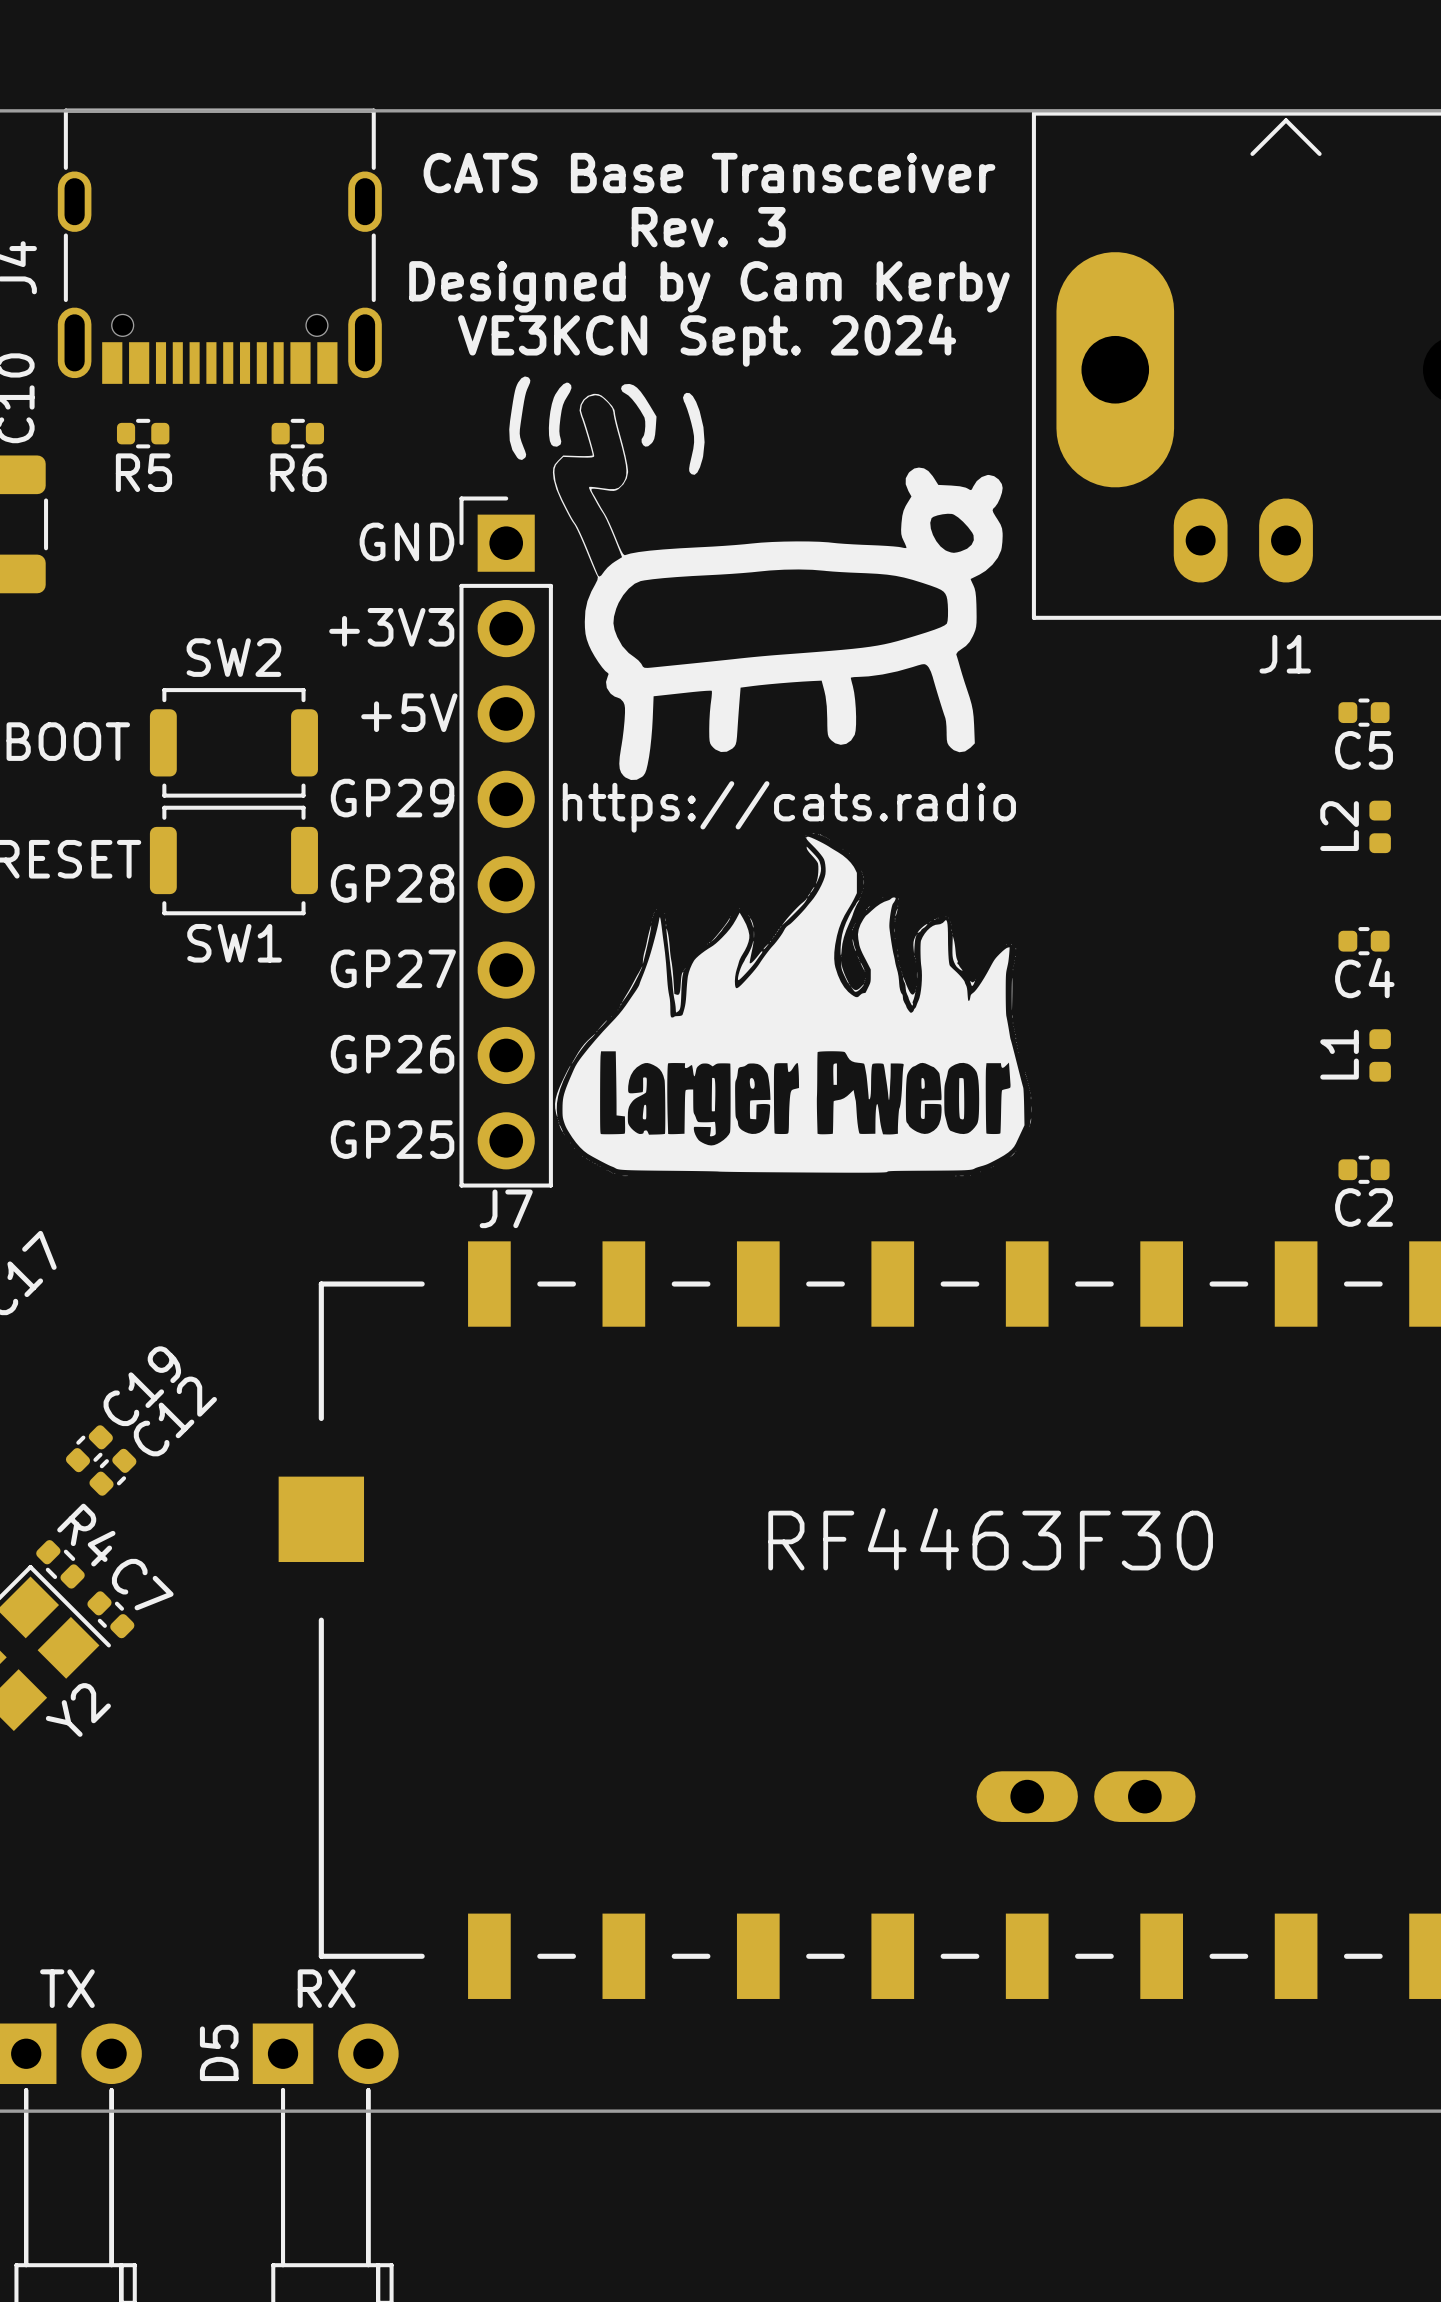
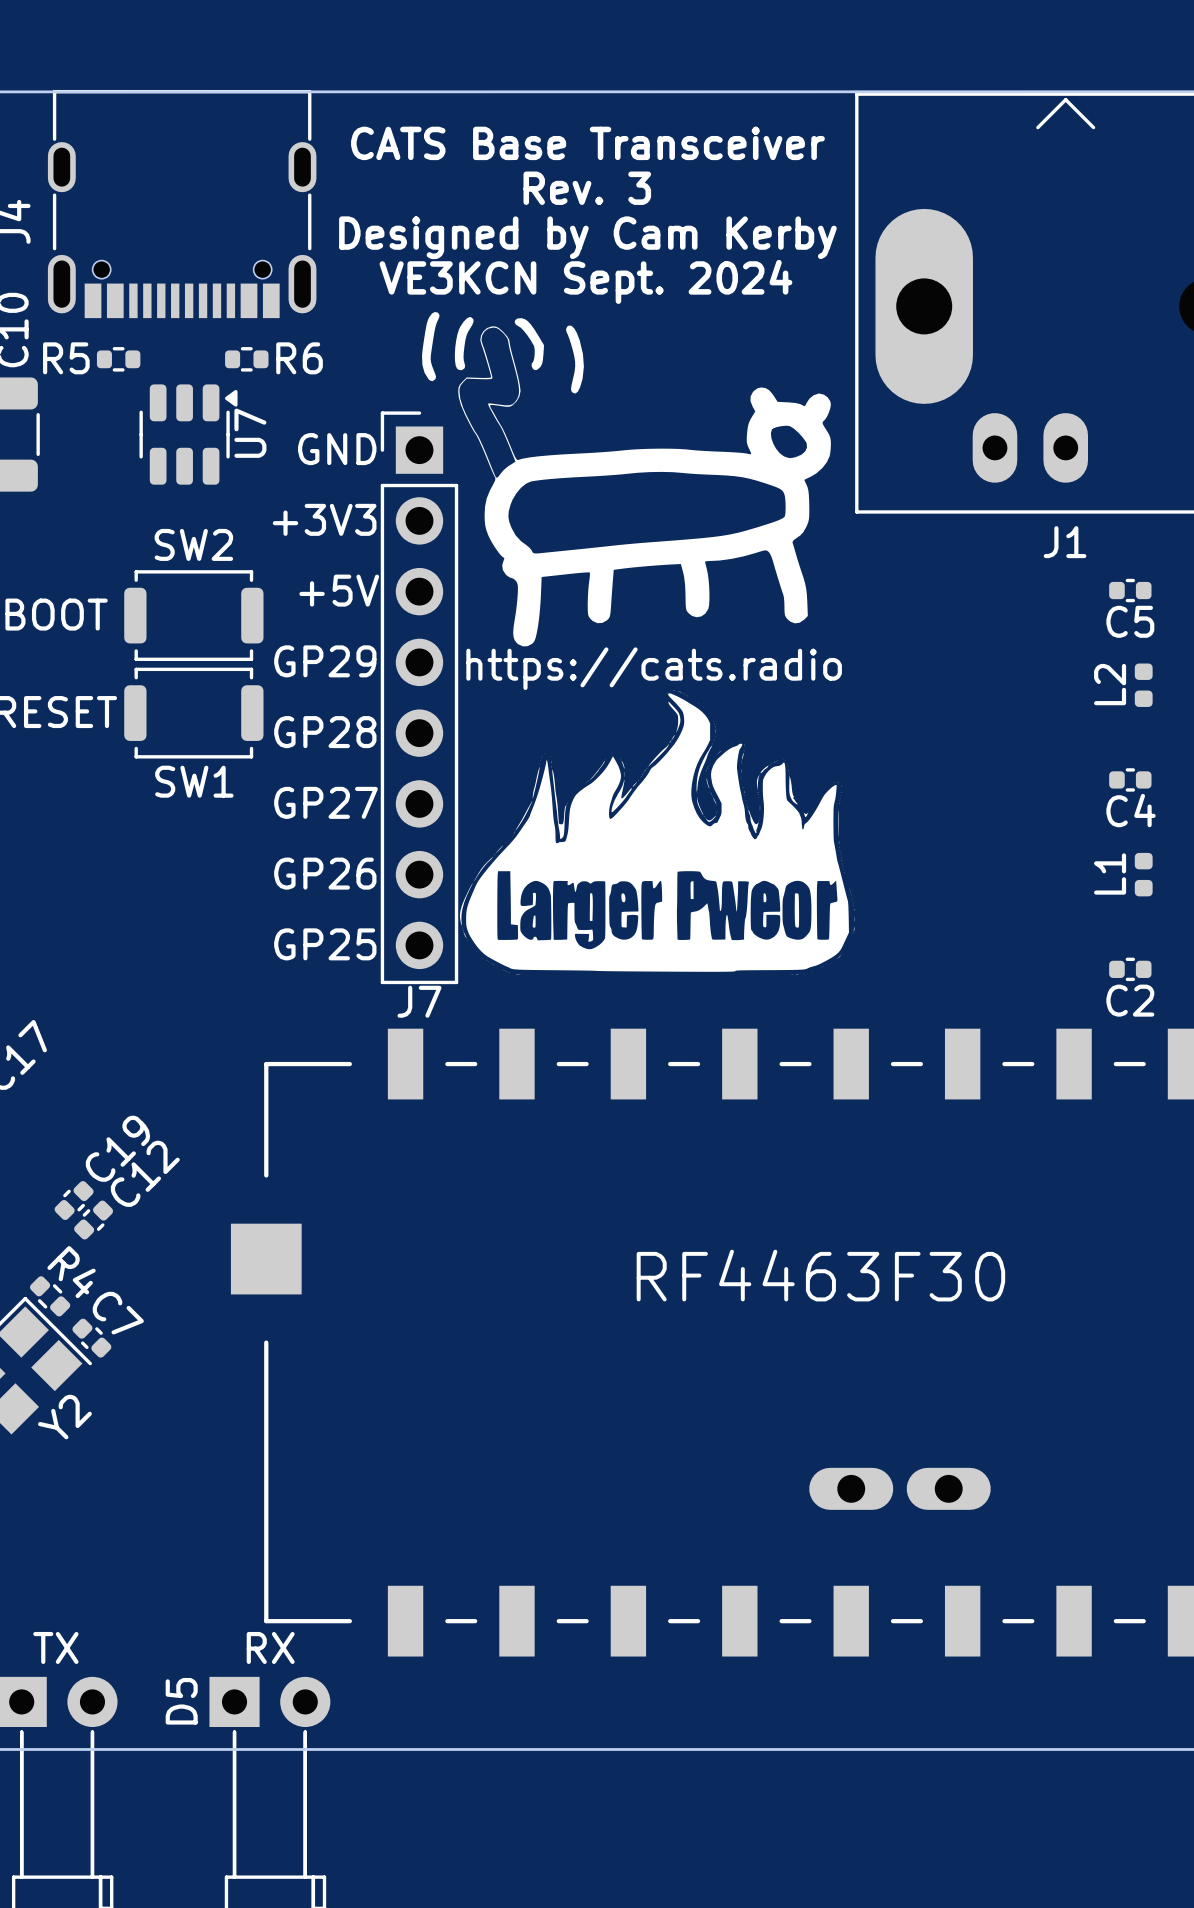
R5 name position: R5 (143, 472) -> R5 (66, 358)
R6 name position: R6 (298, 472) -> R6 (299, 358)
U7: none -> (188, 434)

